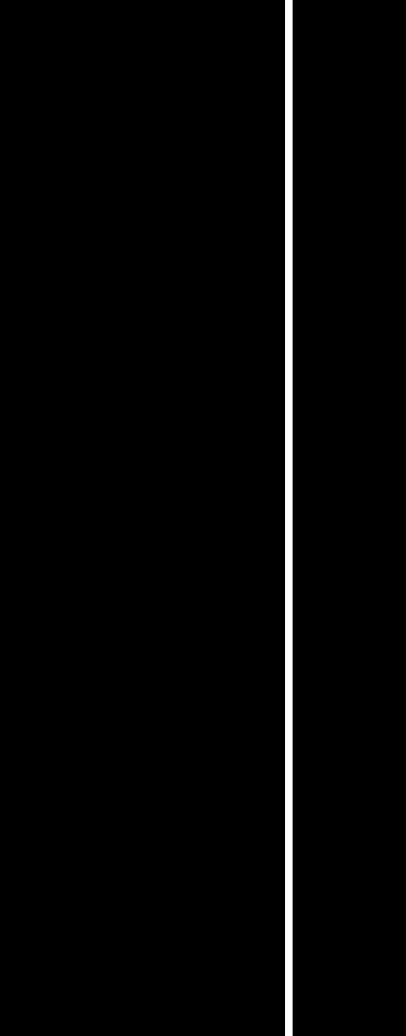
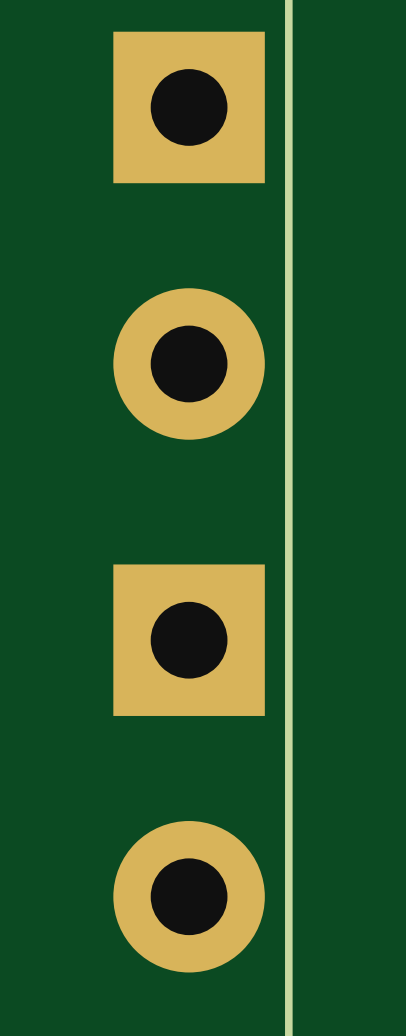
part: none -> (189, 235)
part: none -> (189, 768)

